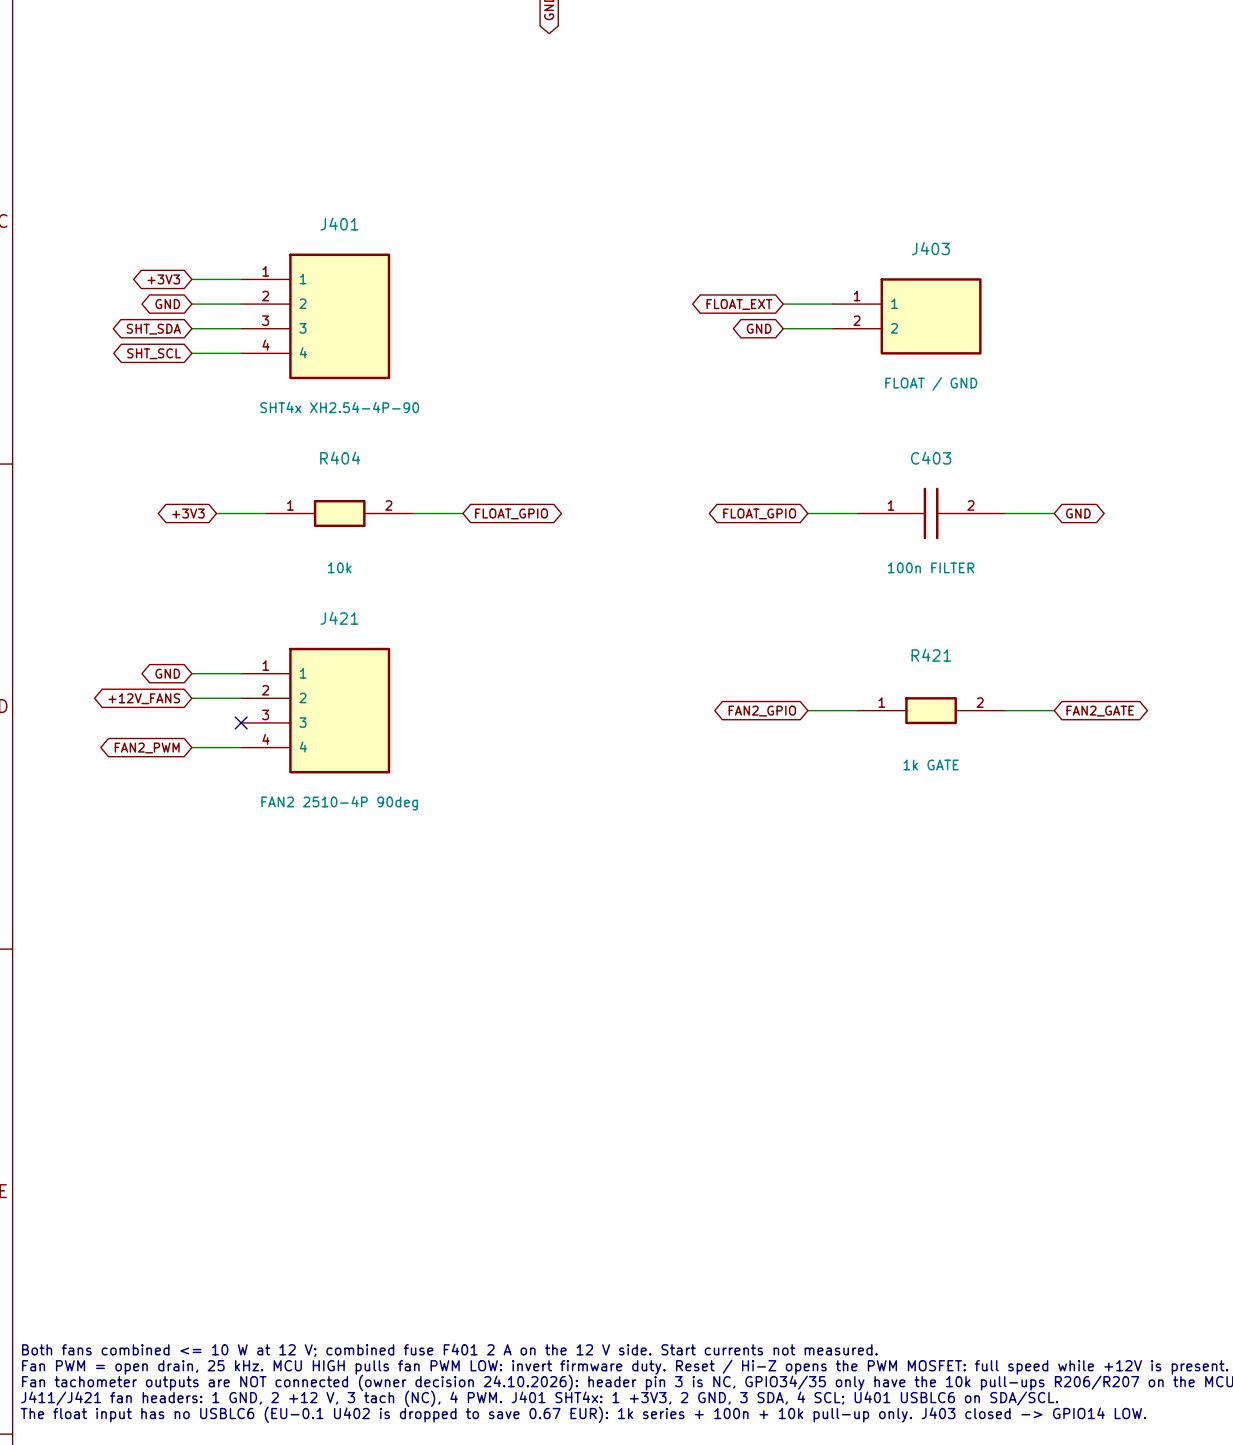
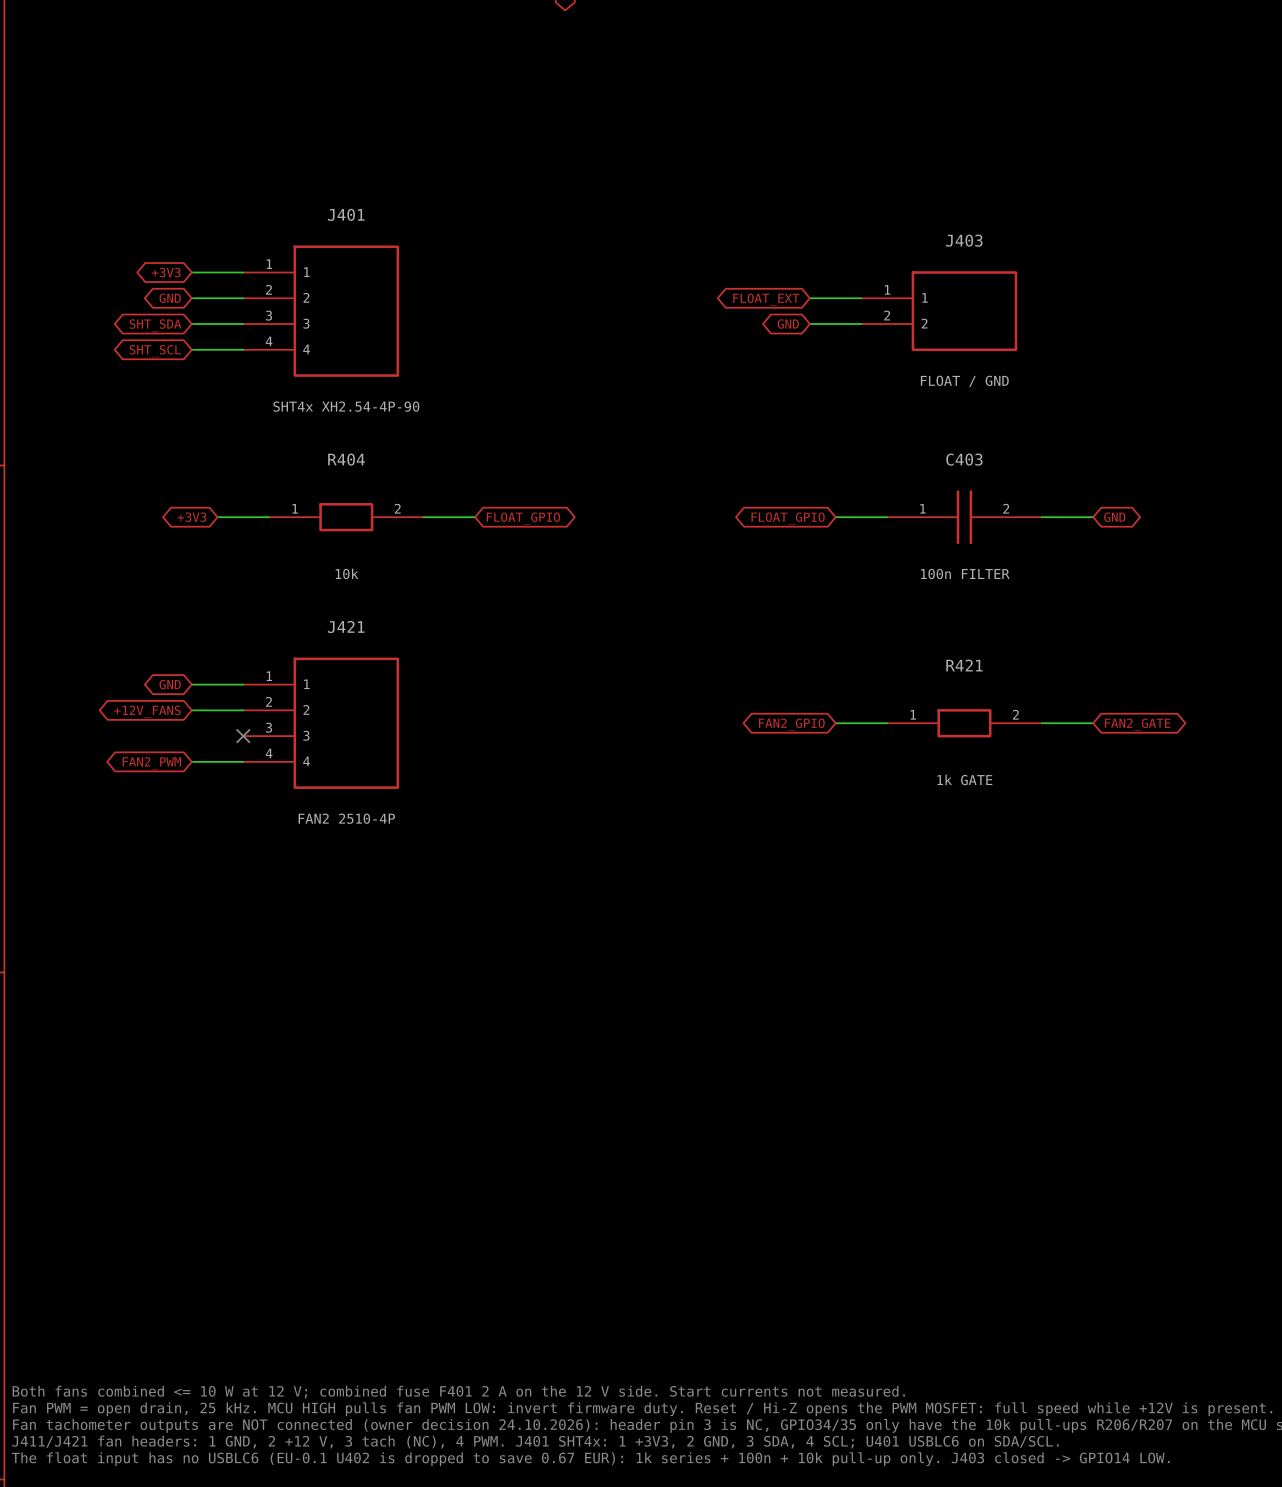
J421 value: FAN2 2510-4P 90deg (339, 803) -> FAN2 2510-4P (346, 818)

